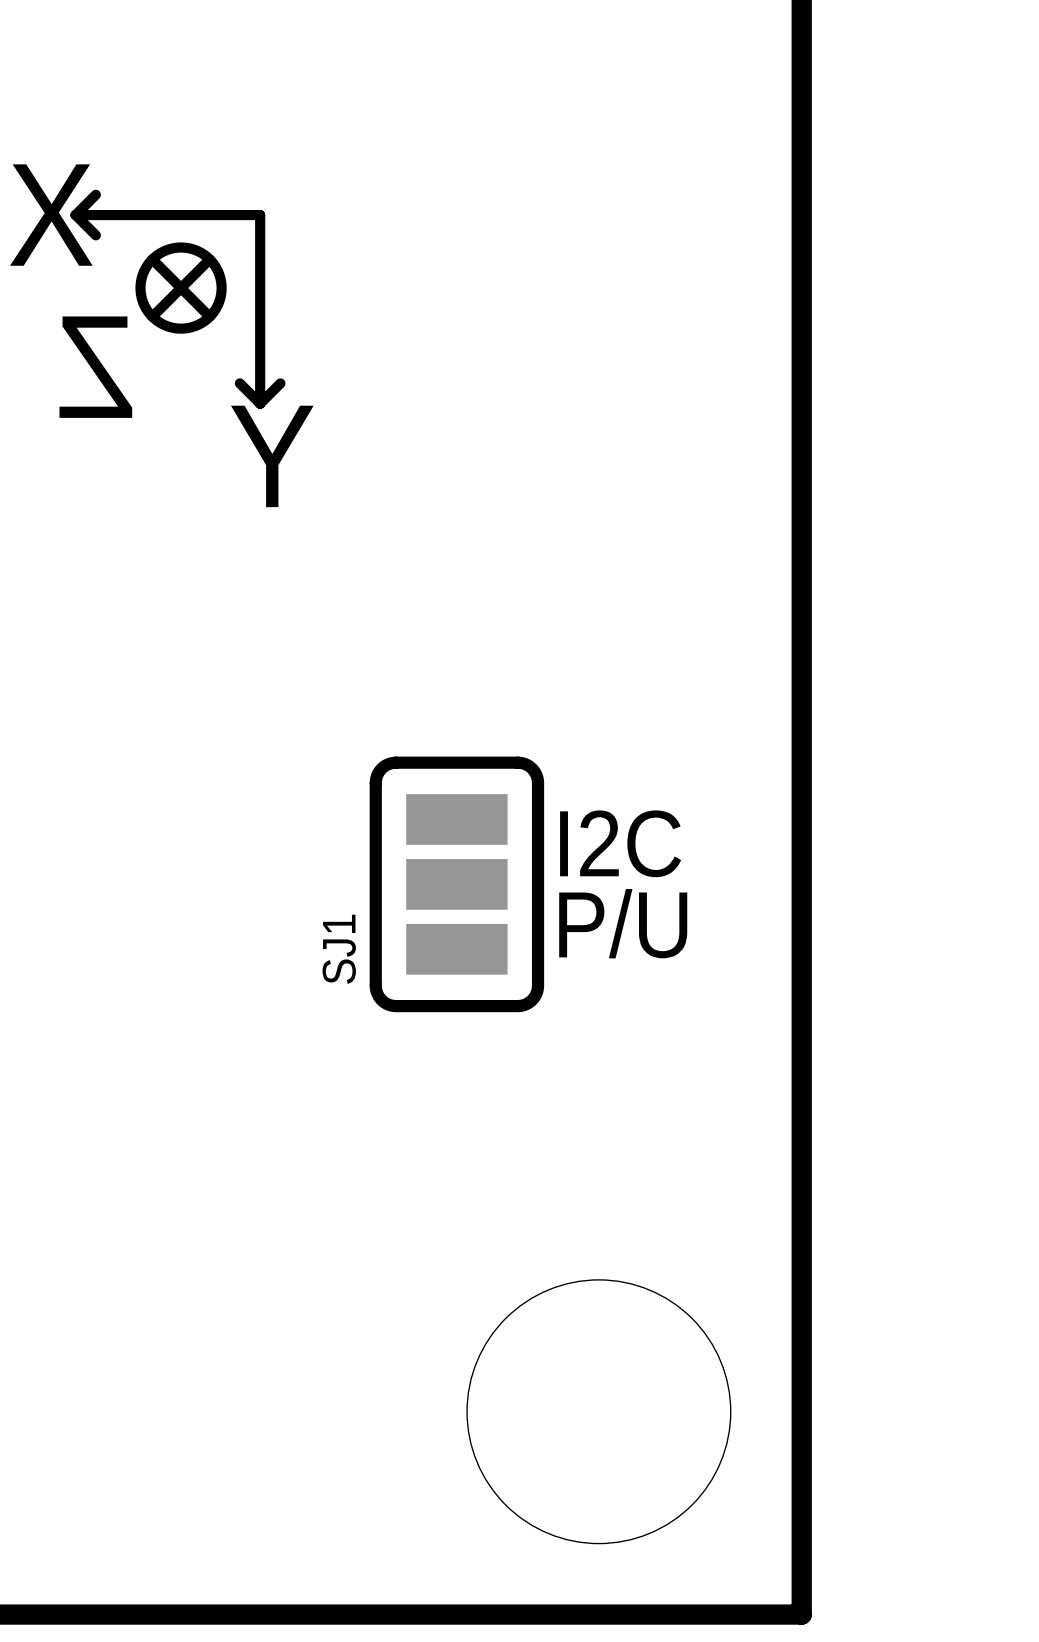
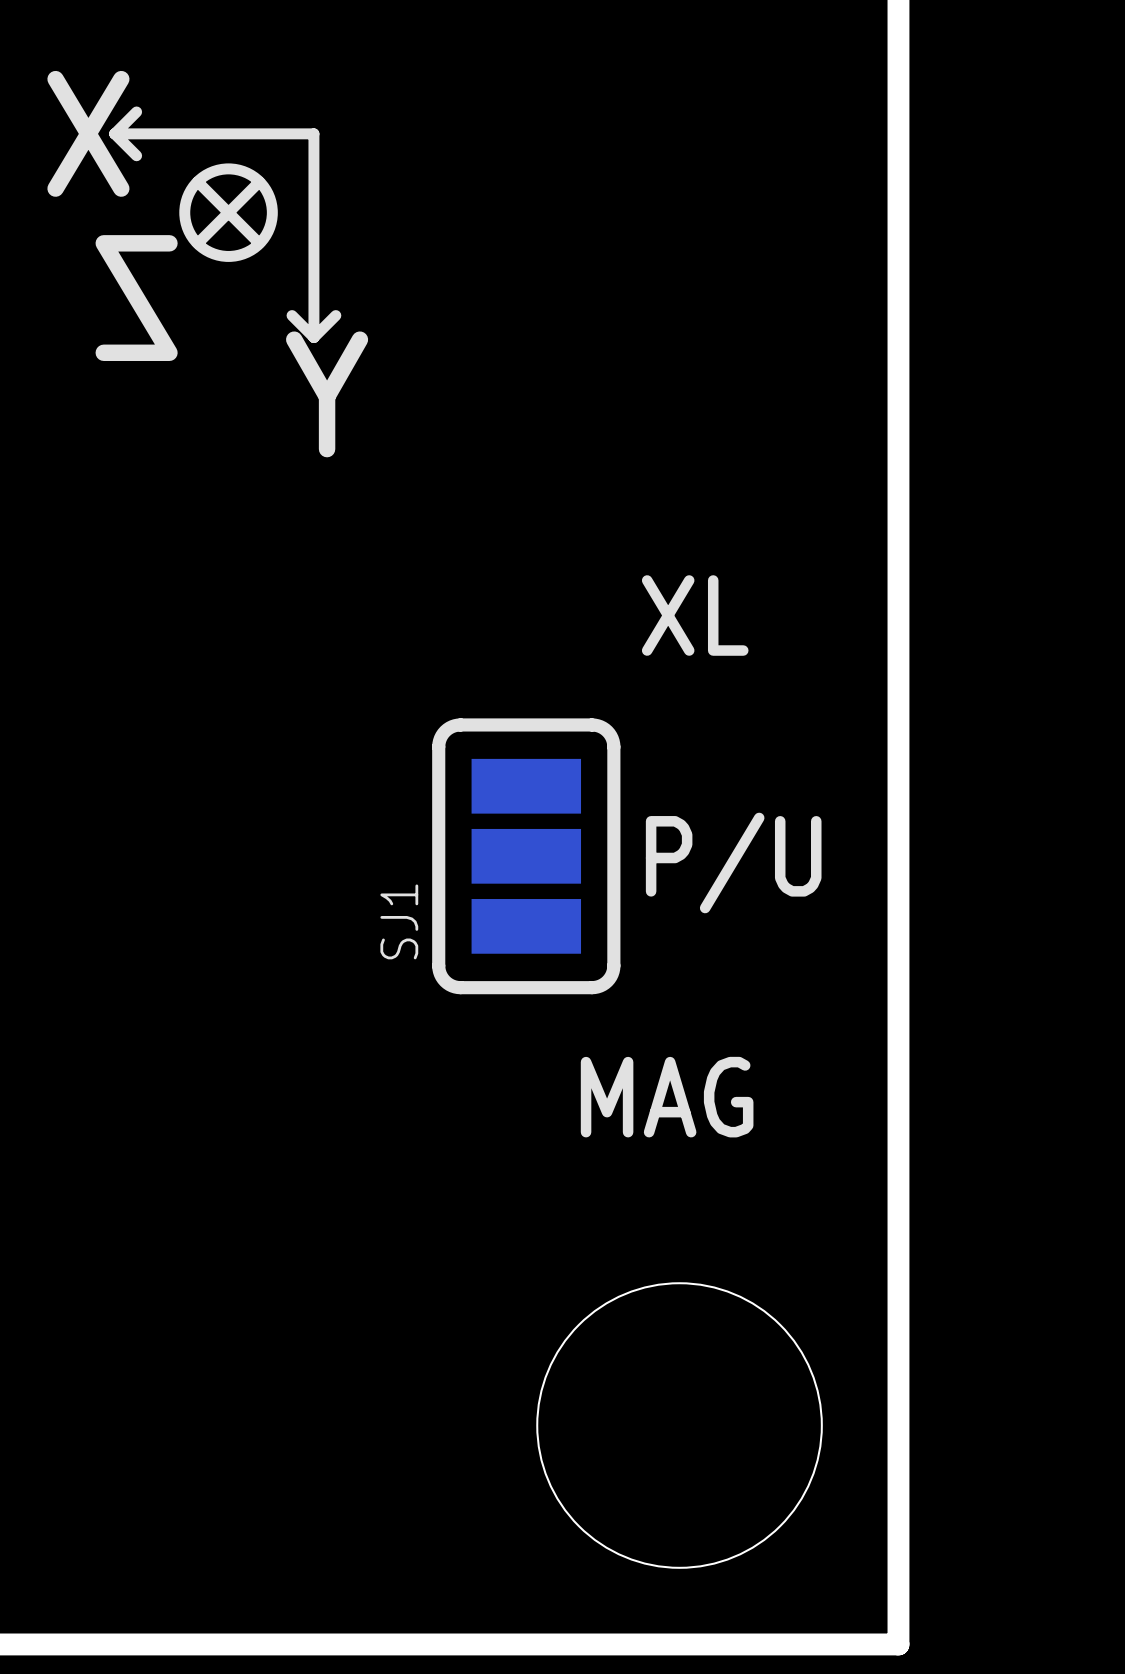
text: none -> XL (695, 615)
text: I2C (620, 843) -> none
text position: P/U (623, 923) -> P/U (733, 862)
text: none -> MAG (667, 1097)

